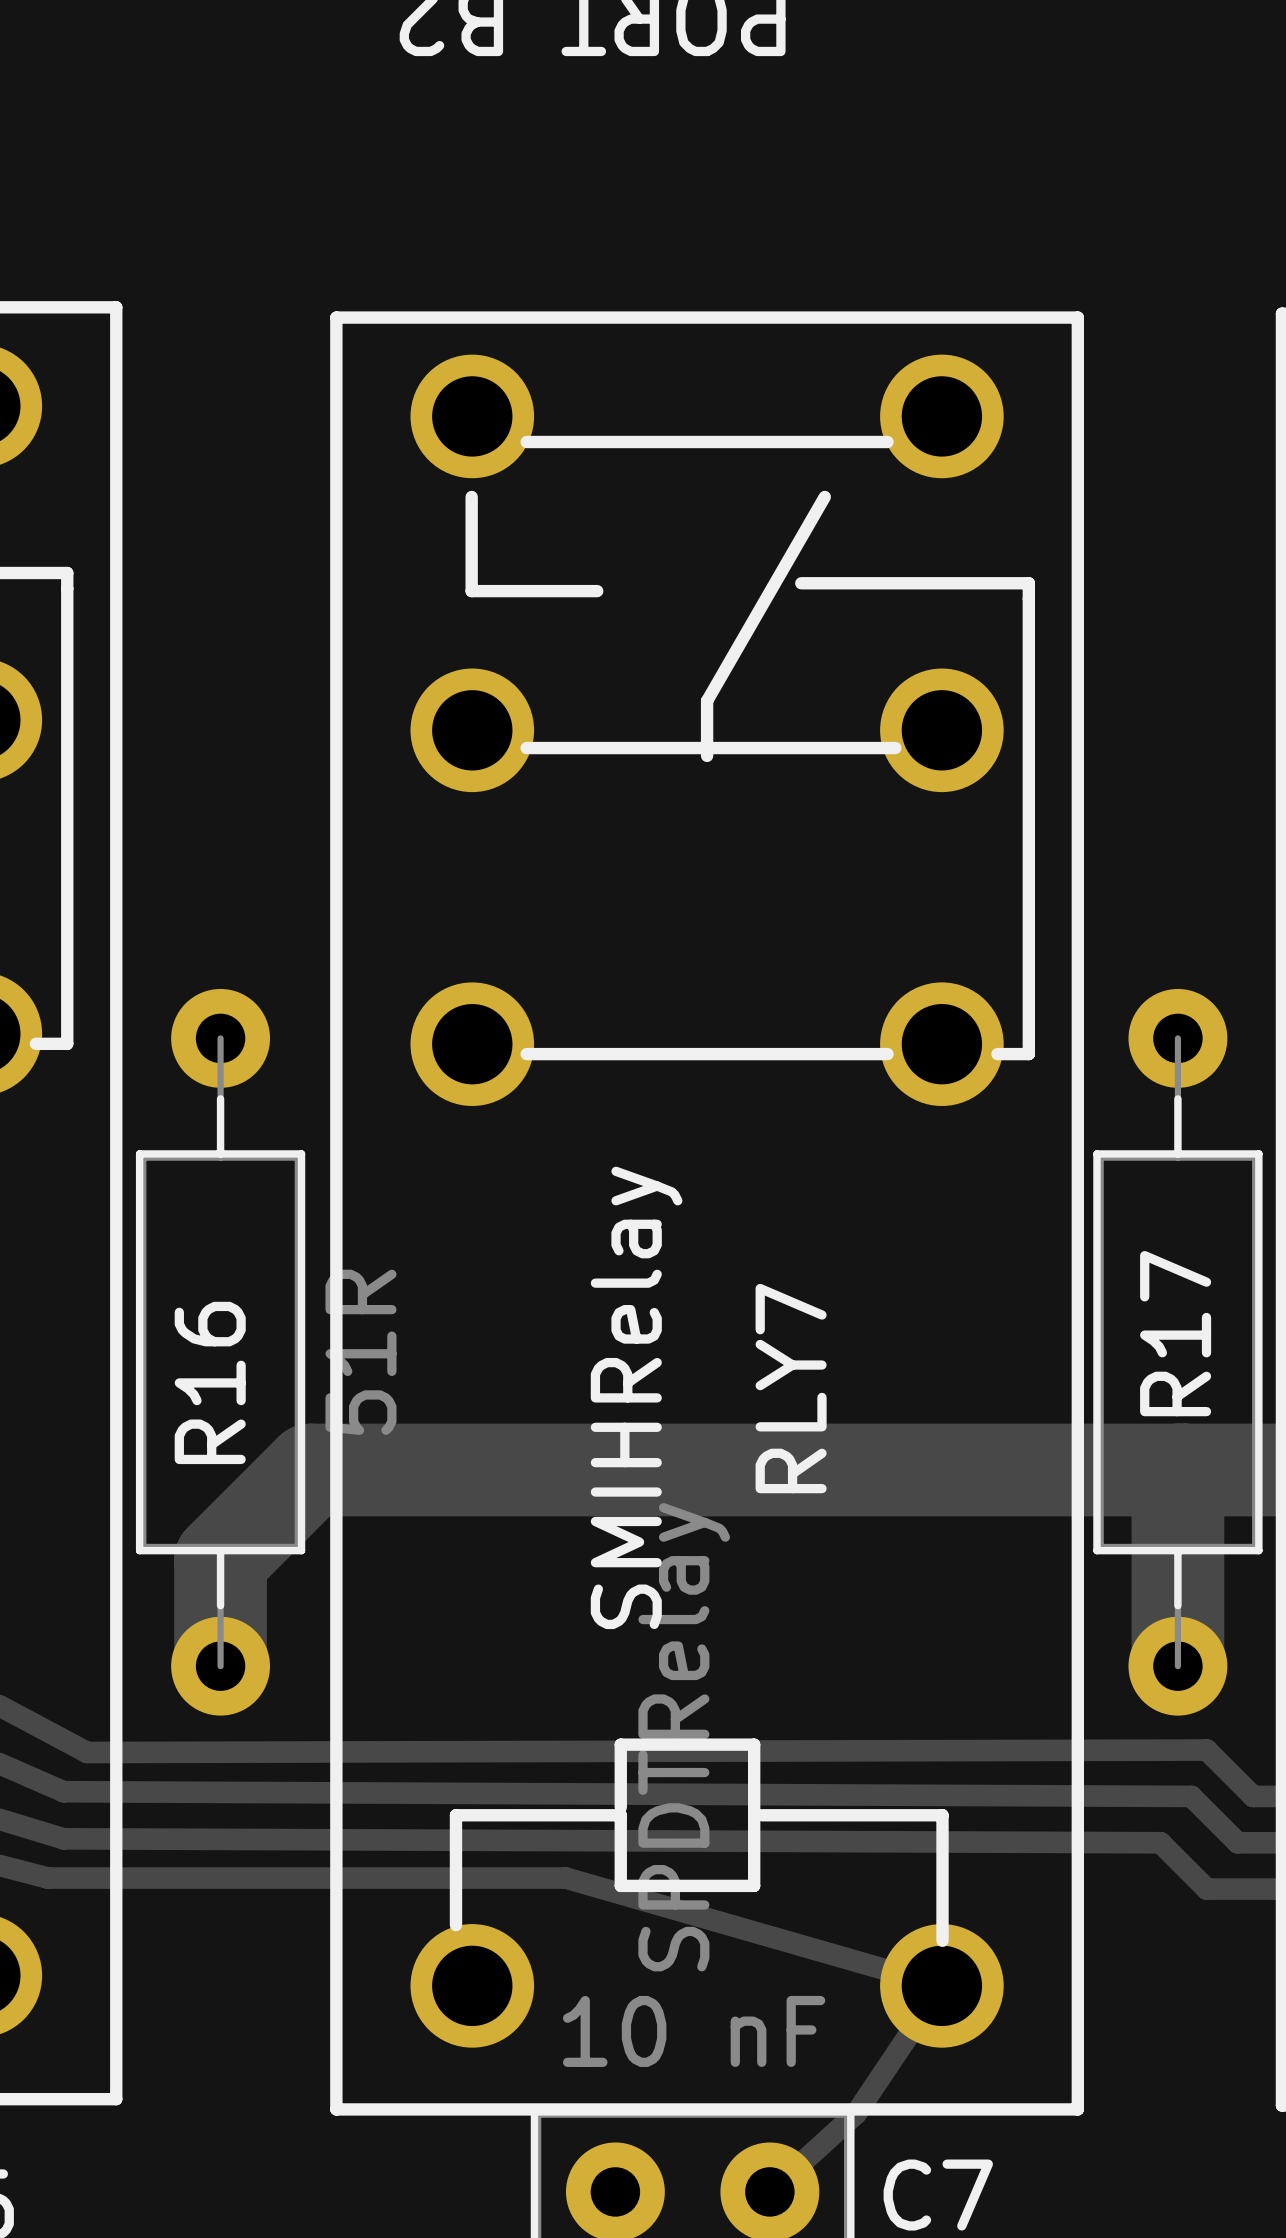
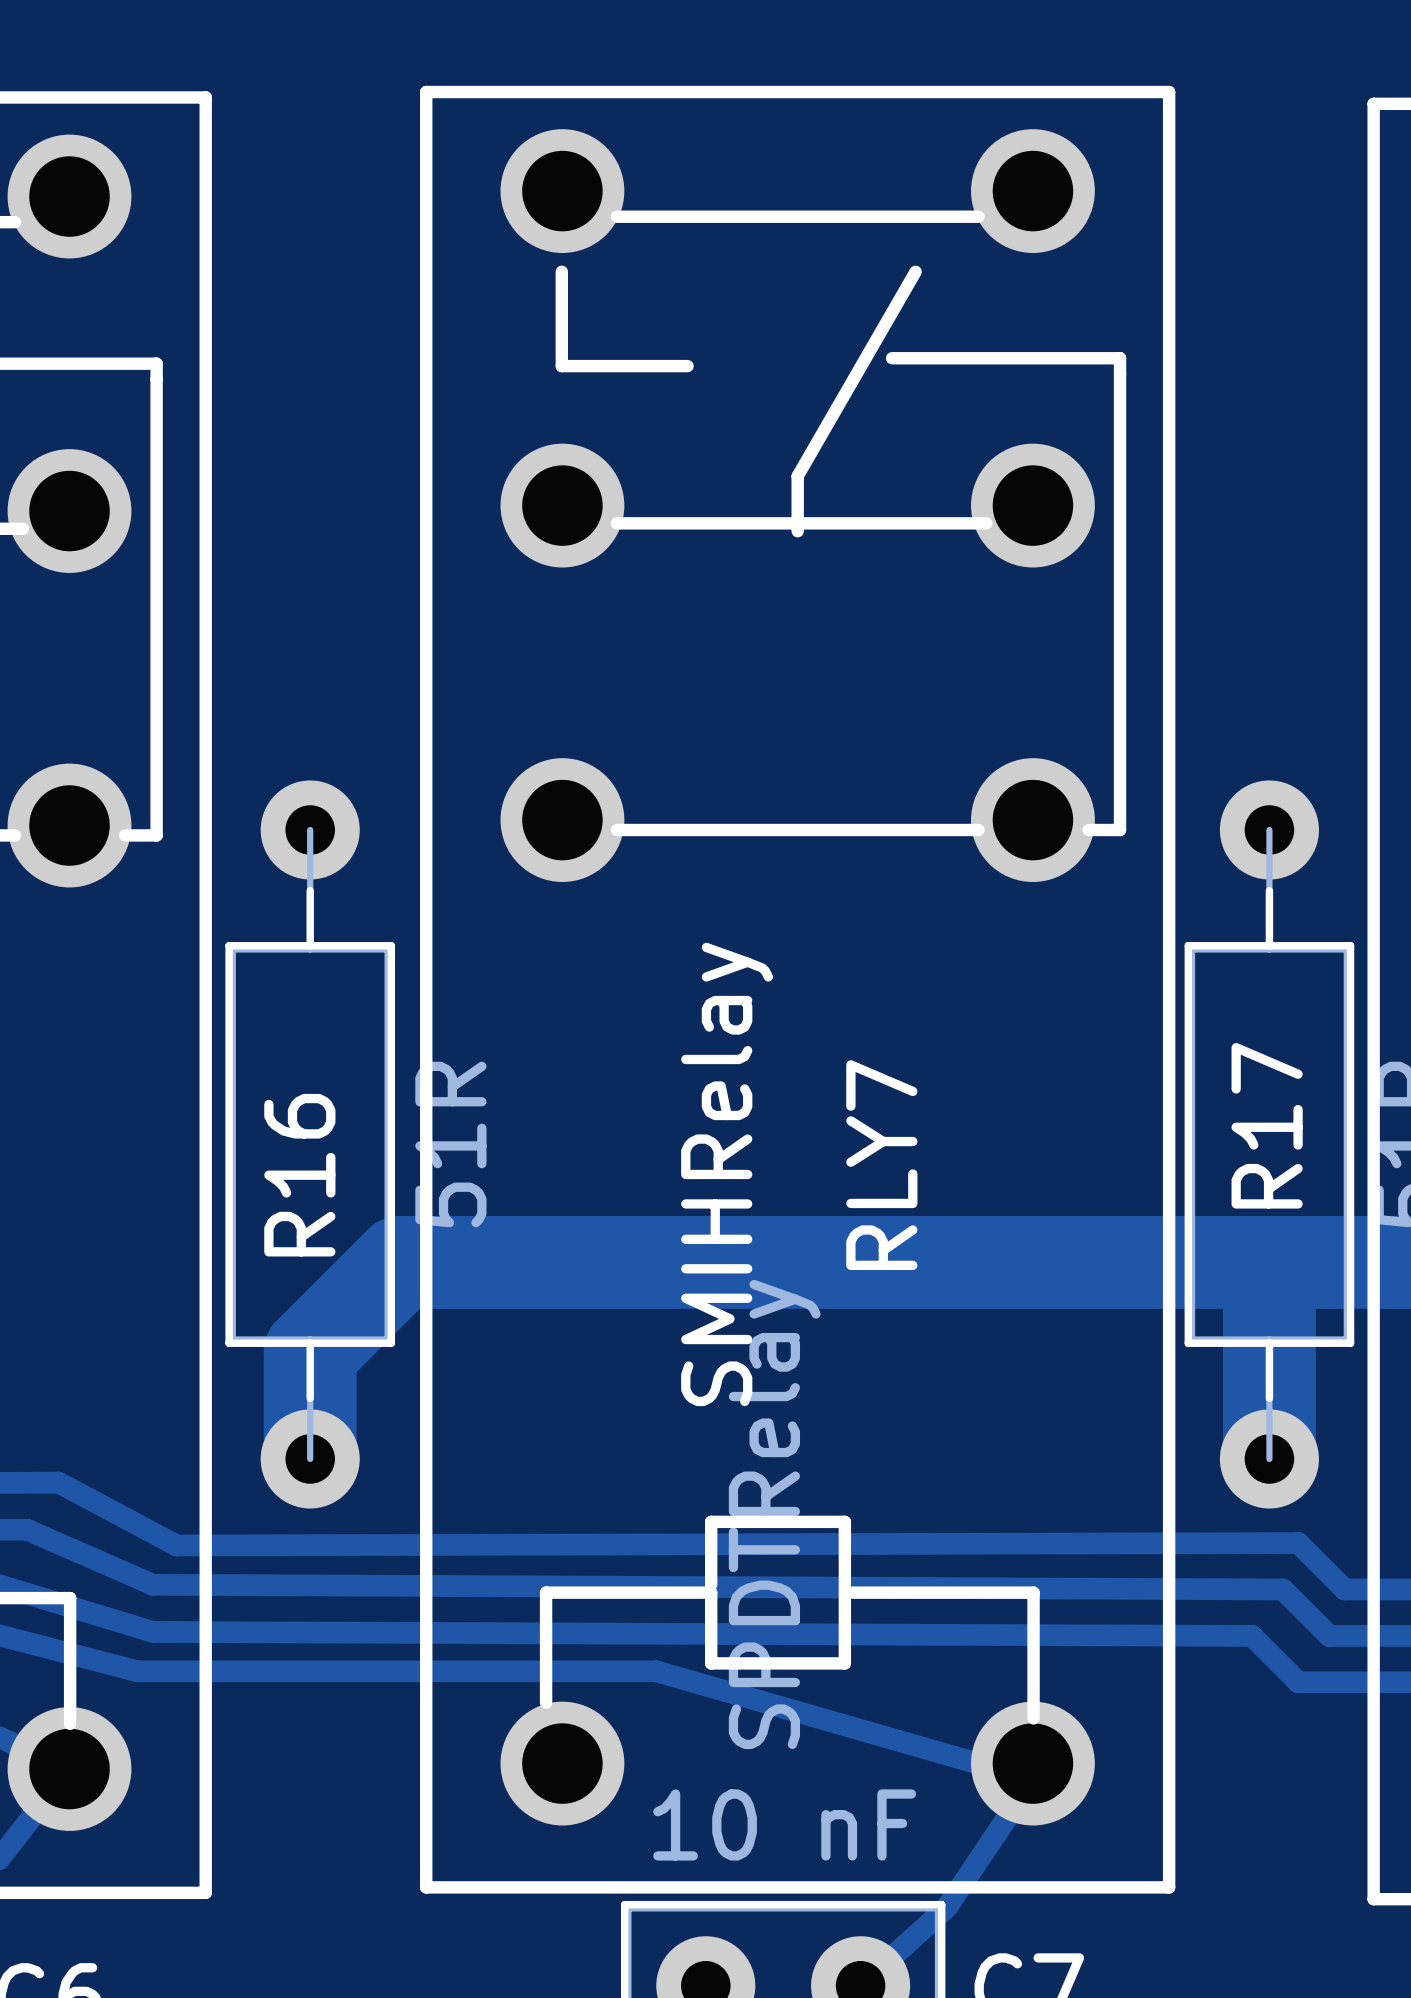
RLY7 position: (707, 1213) -> (797, 989)

